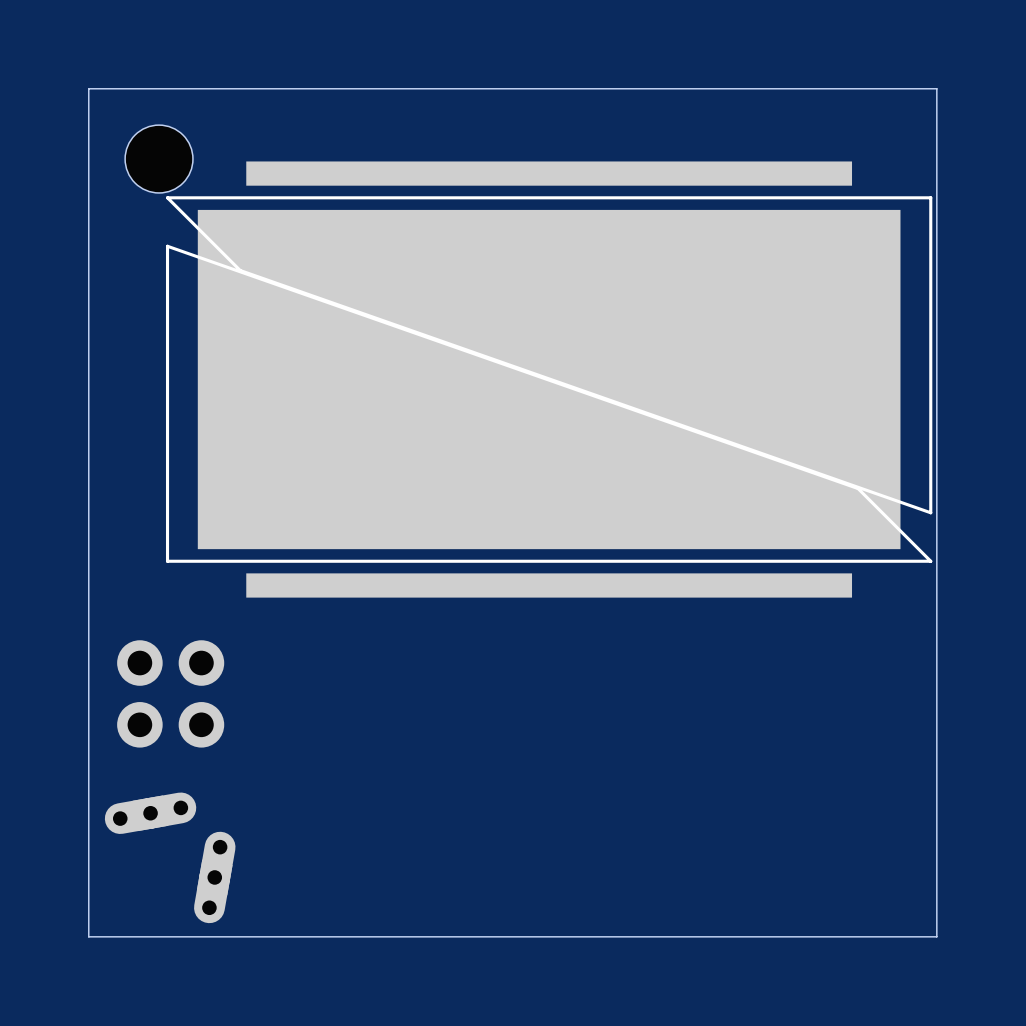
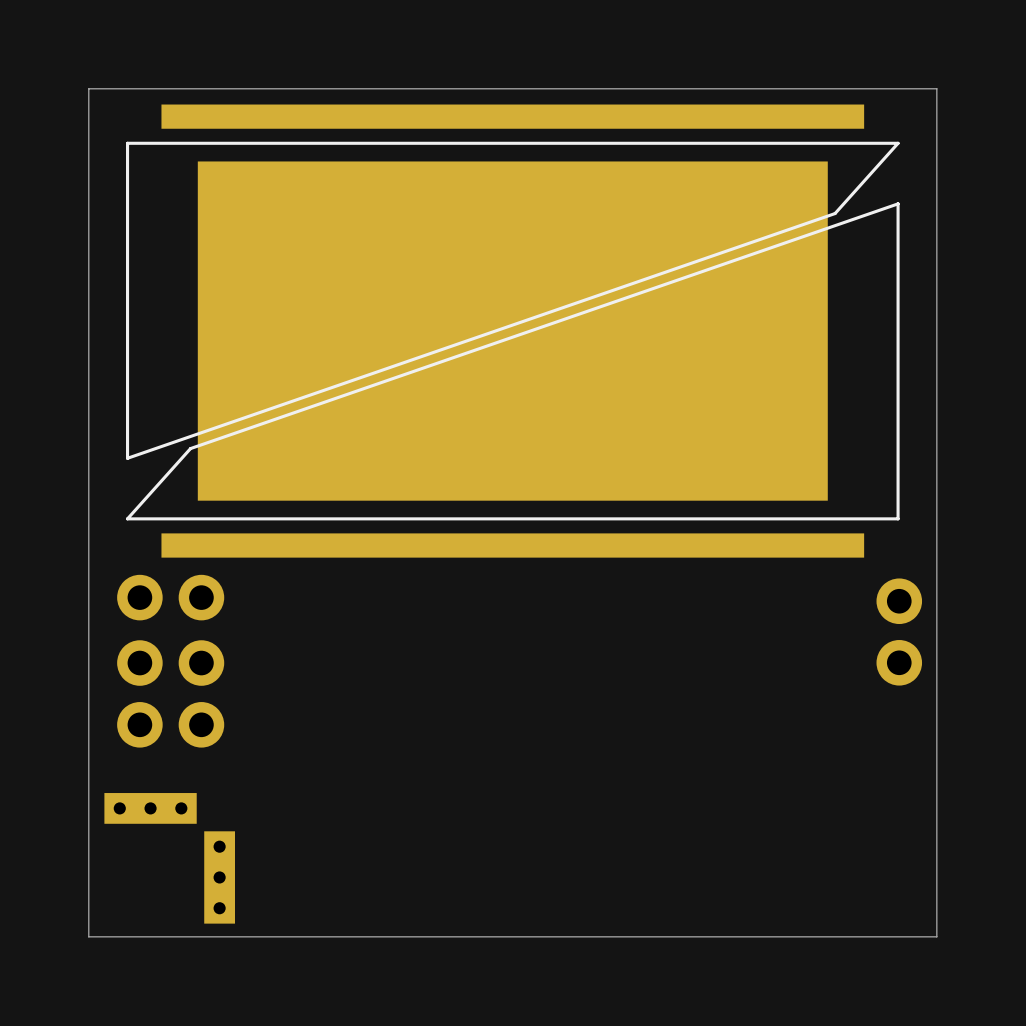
hole: (159, 159) -> none
part: none -> (512, 331)
part: (549, 379) -> none
part: none -> (170, 597)
part: none -> (899, 632)
part footprint: [104, 792, 197, 834] -> [104, 793, 197, 824]
part footprint: [194, 831, 236, 924] -> [204, 831, 236, 924]

